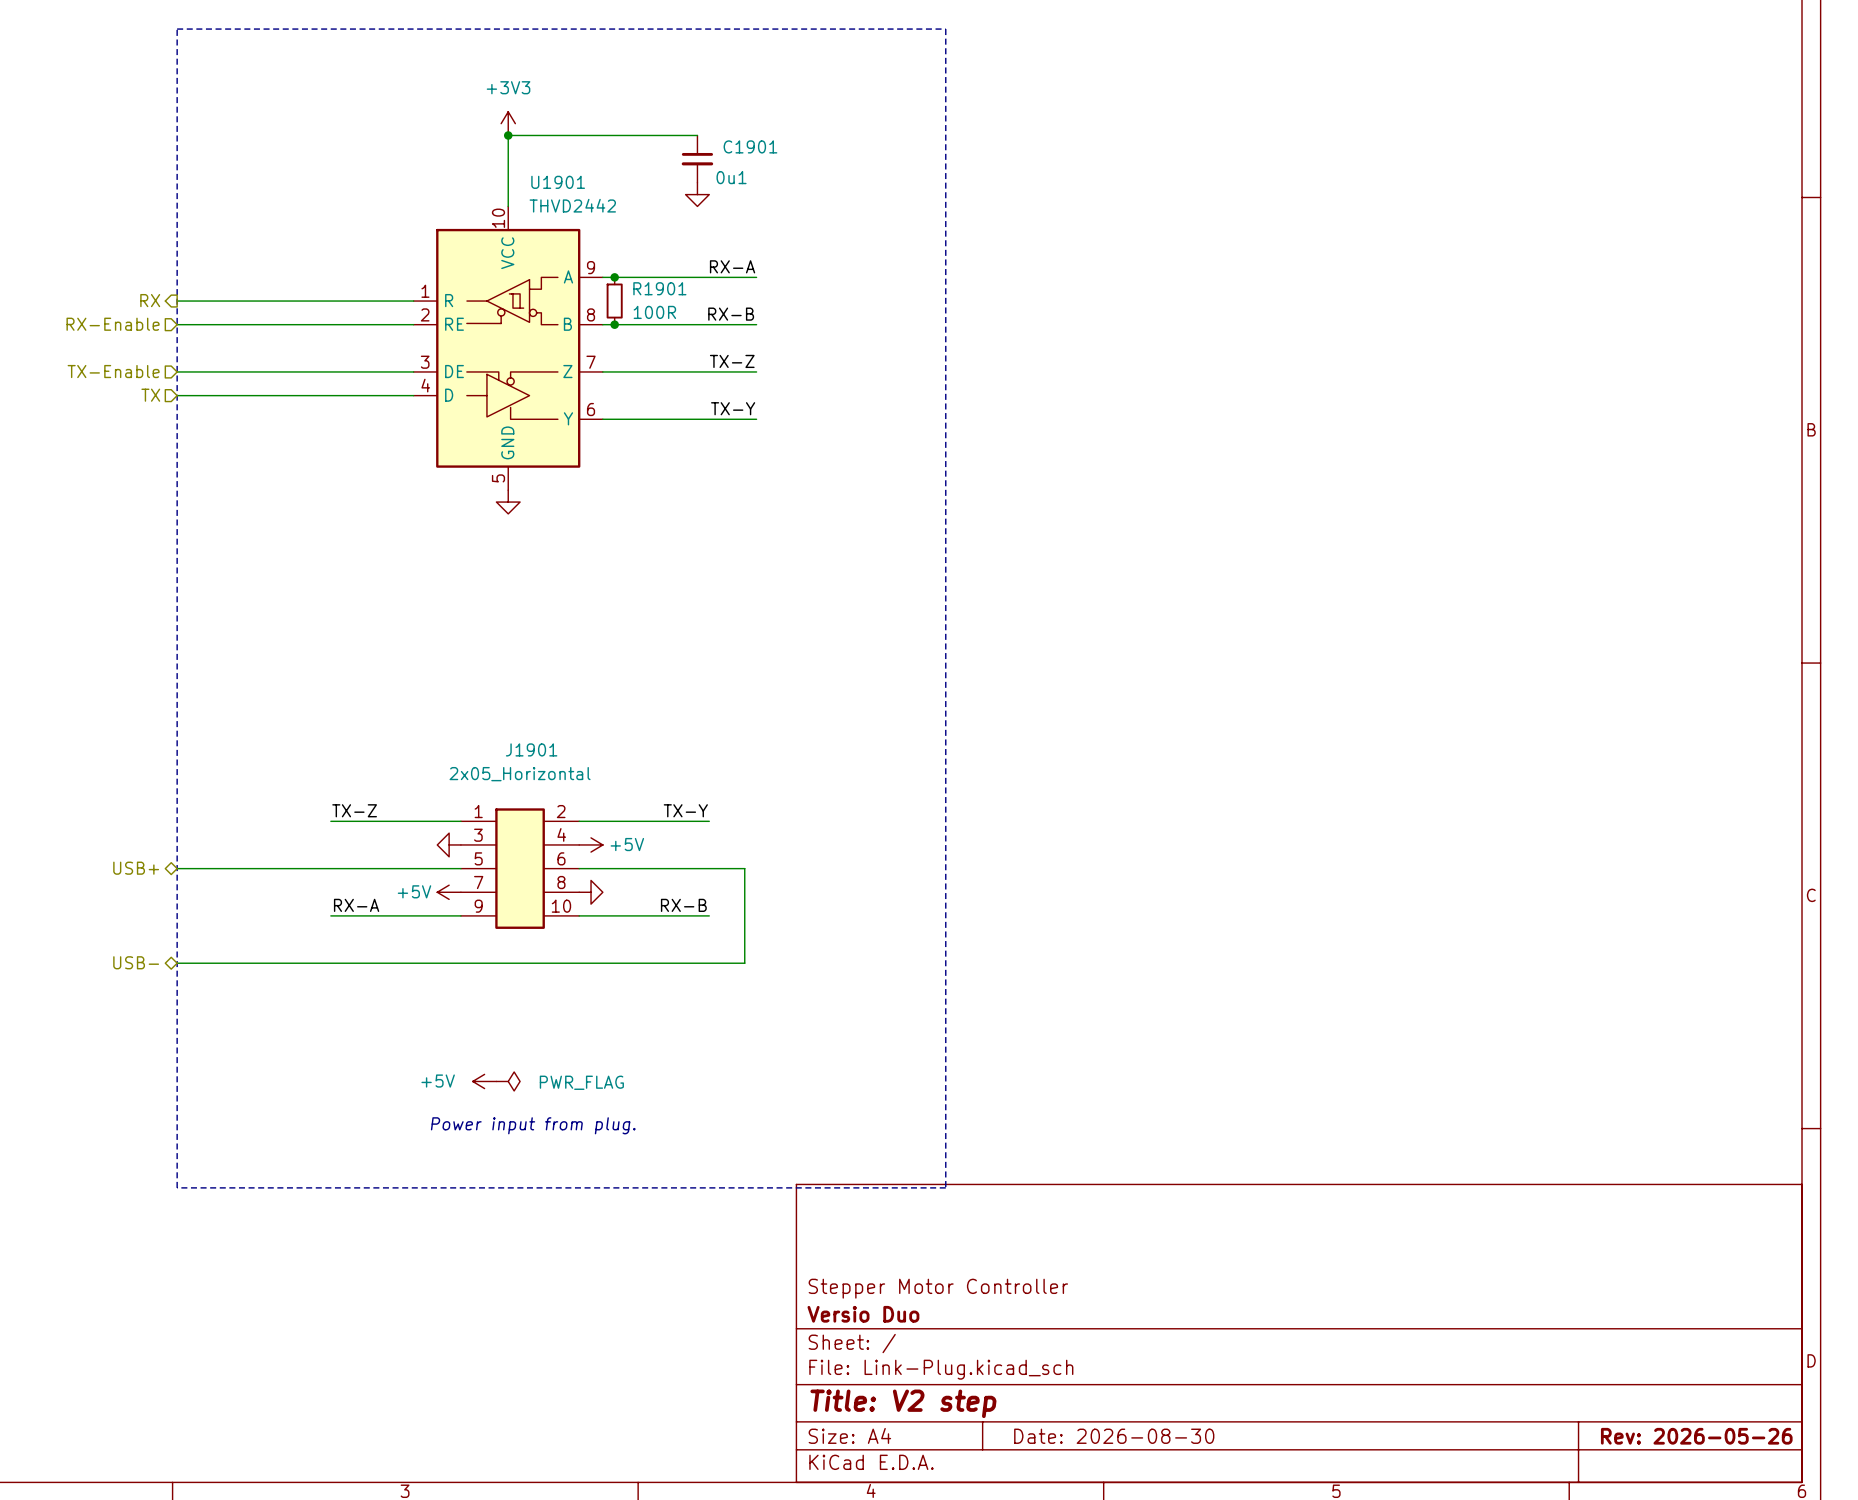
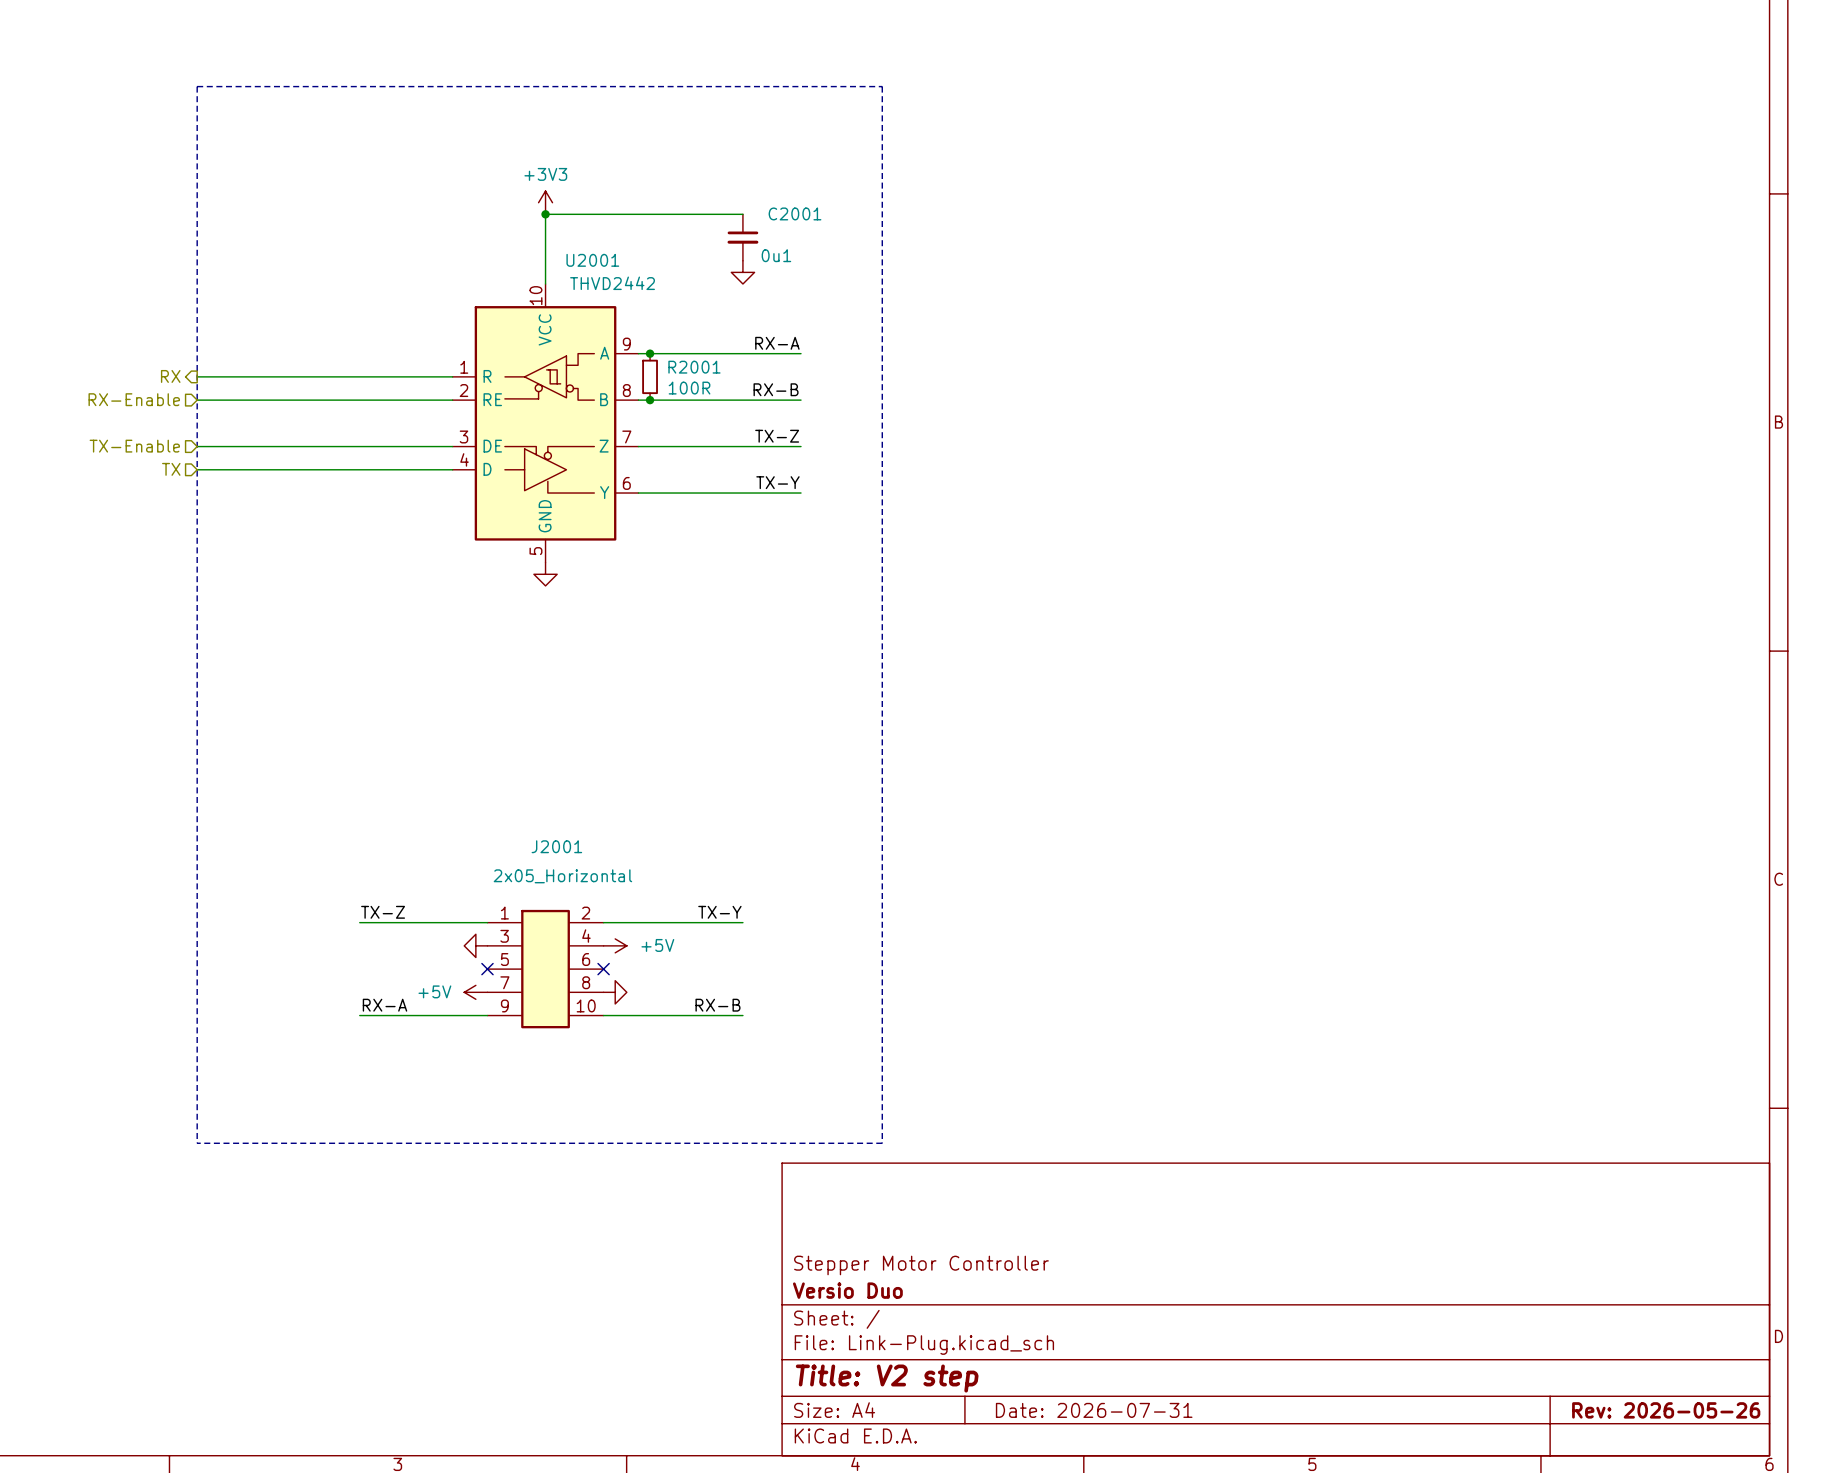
line: (177, 29) (945, 29) (945, 1187) (177, 1187) (177, 29) -> (197, 86) (197, 1143) (882, 1143) (882, 86) (197, 86)
power symbol text position: +3V3 (508, 87) -> +3V3 (545, 174)
power symbol position: +3V3 (508, 123) -> +3V3 (545, 202)
junction: (508, 135) -> none
wire: (697, 135) (508, 135) (508, 206) -> none
C1901: 0u1 (697, 159) -> none
power symbol position: (697, 194) -> (742, 272)
junction: none -> (545, 214)
wire: none -> (742, 214) (545, 214) (545, 283)
C2001: none -> 0u1 (742, 237)
label position: RX-A (732, 266) -> RX-A (777, 343)
wire: (602, 277) (756, 277) -> none
junction: (614, 277) -> none
hierarchical label position: RX (150, 300) -> RX (170, 376)
wire: (177, 301) (413, 301) -> none
R1901: 100R (614, 301) -> none
label position: RX-B (731, 314) -> RX-B (776, 389)
hierarchical label position: RX-Enable (113, 324) -> RX-Enable (134, 399)
wire: (177, 324) (413, 324) -> none
wire: (602, 324) (756, 324) -> none
junction: (614, 324) -> none
U1901: THVD2442 (508, 348) -> none
wire: none -> (638, 353) (801, 353)
junction: none -> (650, 353)
label position: TX-Z (732, 361) -> TX-Z (777, 436)
hierarchical label position: TX-Enable (113, 371) -> TX-Enable (134, 446)
wire: (177, 371) (413, 371) -> none
wire: (602, 371) (756, 371) -> none
wire: none -> (197, 376) (452, 376)
R2001: none -> 100R (650, 376)
hierarchical label position: TX (150, 395) -> TX (171, 469)
wire: (177, 395) (413, 395) -> none
wire: none -> (197, 400) (452, 400)
wire: none -> (638, 400) (801, 400)
junction: none -> (650, 400)
label position: TX-Y (733, 408) -> TX-Y (777, 482)
wire: (602, 419) (756, 419) -> none
U2001: none -> THVD2442 (545, 423)
wire: none -> (197, 446) (452, 446)
wire: none -> (638, 446) (801, 446)
wire: none -> (197, 469) (452, 469)
power symbol position: (508, 502) -> (545, 574)
wire: none -> (638, 493) (801, 493)
label position: TX-Z (354, 810) -> TX-Z (383, 912)
label position: TX-Y (685, 810) -> TX-Y (719, 912)
wire: (330, 821) (460, 821) -> (359, 922) (487, 922)
wire: (579, 821) (709, 821) -> none
power symbol: (449, 844) -> none
power symbol: +5V (591, 844) -> none
hierarchical label: USB+ (136, 868) -> none
wire: (177, 868) (460, 868) -> none
J1901: 2x05_Horizontal (520, 868) -> none
wire: (579, 868) (744, 868) (744, 963) (177, 963) -> none
power symbol: +5V (449, 892) -> none
power symbol: (591, 892) -> none
label position: RX-A (356, 905) -> RX-A (384, 1005)
label position: RX-B (683, 905) -> RX-B (717, 1005)
wire: (330, 915) (460, 915) -> (359, 1015) (487, 1015)
wire: (579, 915) (709, 915) -> none
wire: none -> (603, 922) (742, 922)
hierarchical label: USB- (136, 962) -> none
power symbol: none -> (475, 945)
power symbol: none -> +5V (615, 945)
no-connect mark: none -> (487, 969)
J2001: none -> 2x05_Horizontal (545, 969)
no-connect mark: none -> (603, 969)
power symbol: none -> +5V (475, 992)
power symbol: none -> (615, 992)
wire: none -> (603, 1015) (742, 1015)
power symbol: +5V (484, 1081) -> none
power symbol: PWR_FLAG (508, 1081) -> none
text: Power input from plug. (533, 1125) -> none
title block: Date: 2026-08-30 (1114, 1436) -> Date: 2026-07-31 (1094, 1410)

